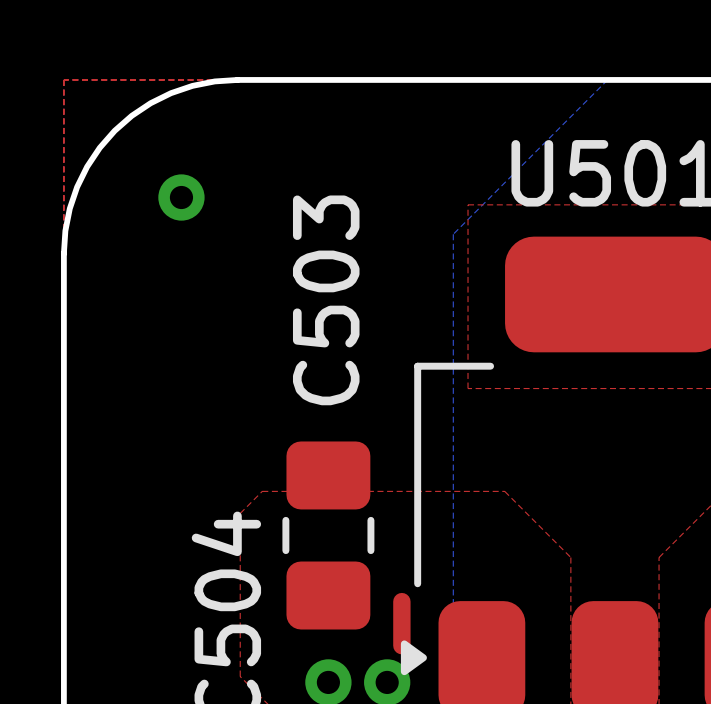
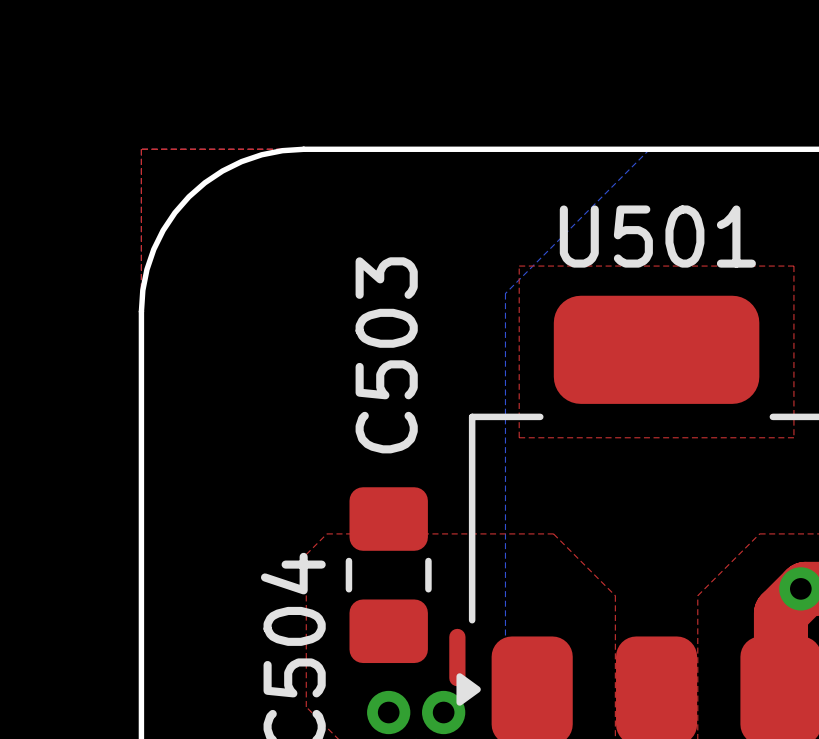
via: (181, 197) -> none

